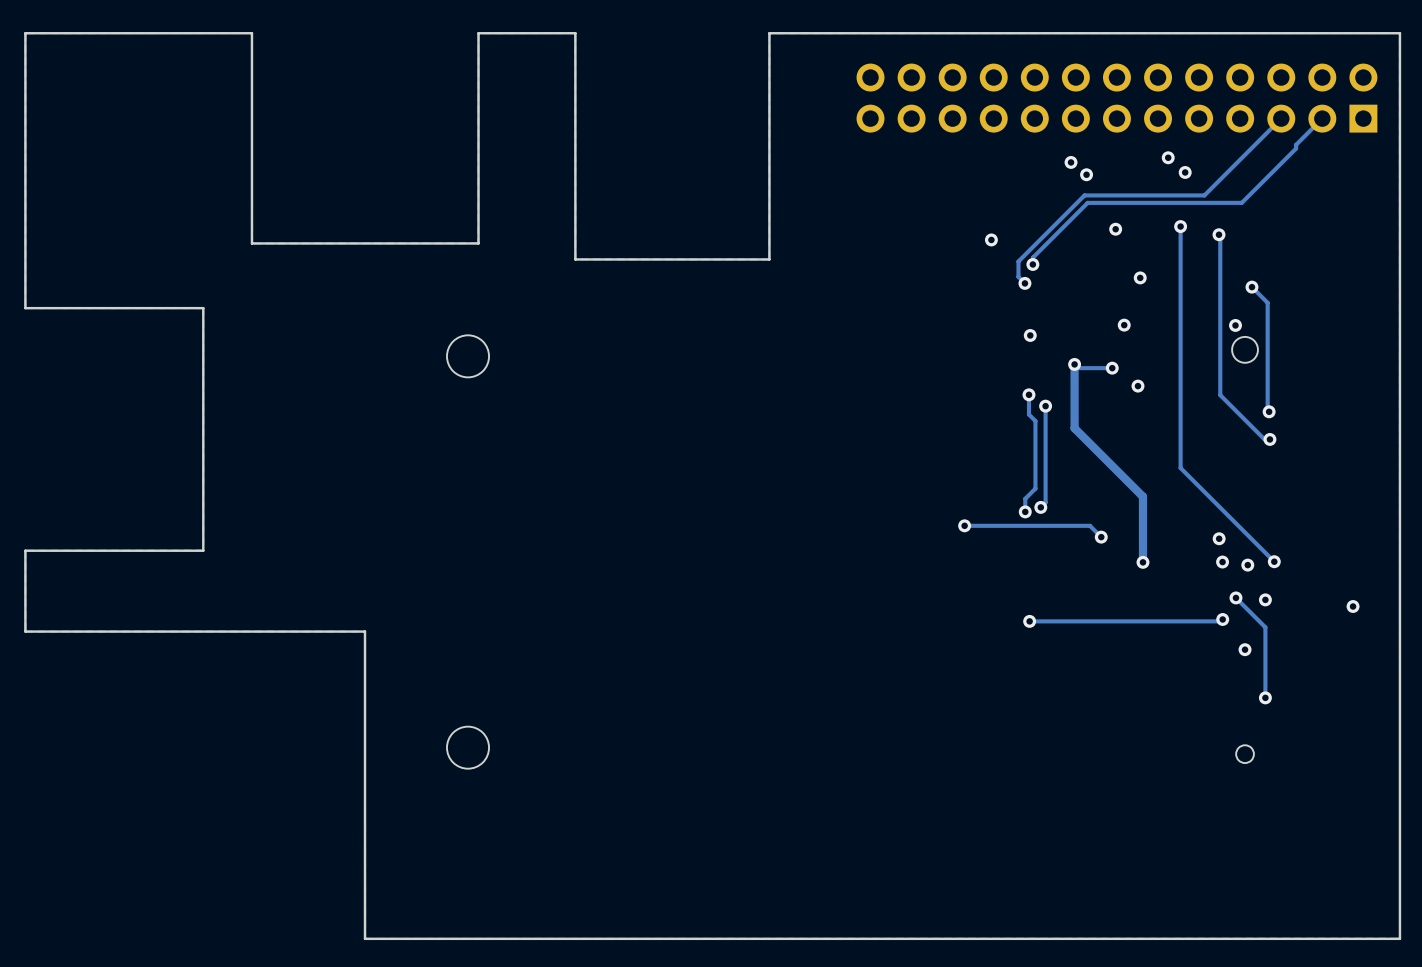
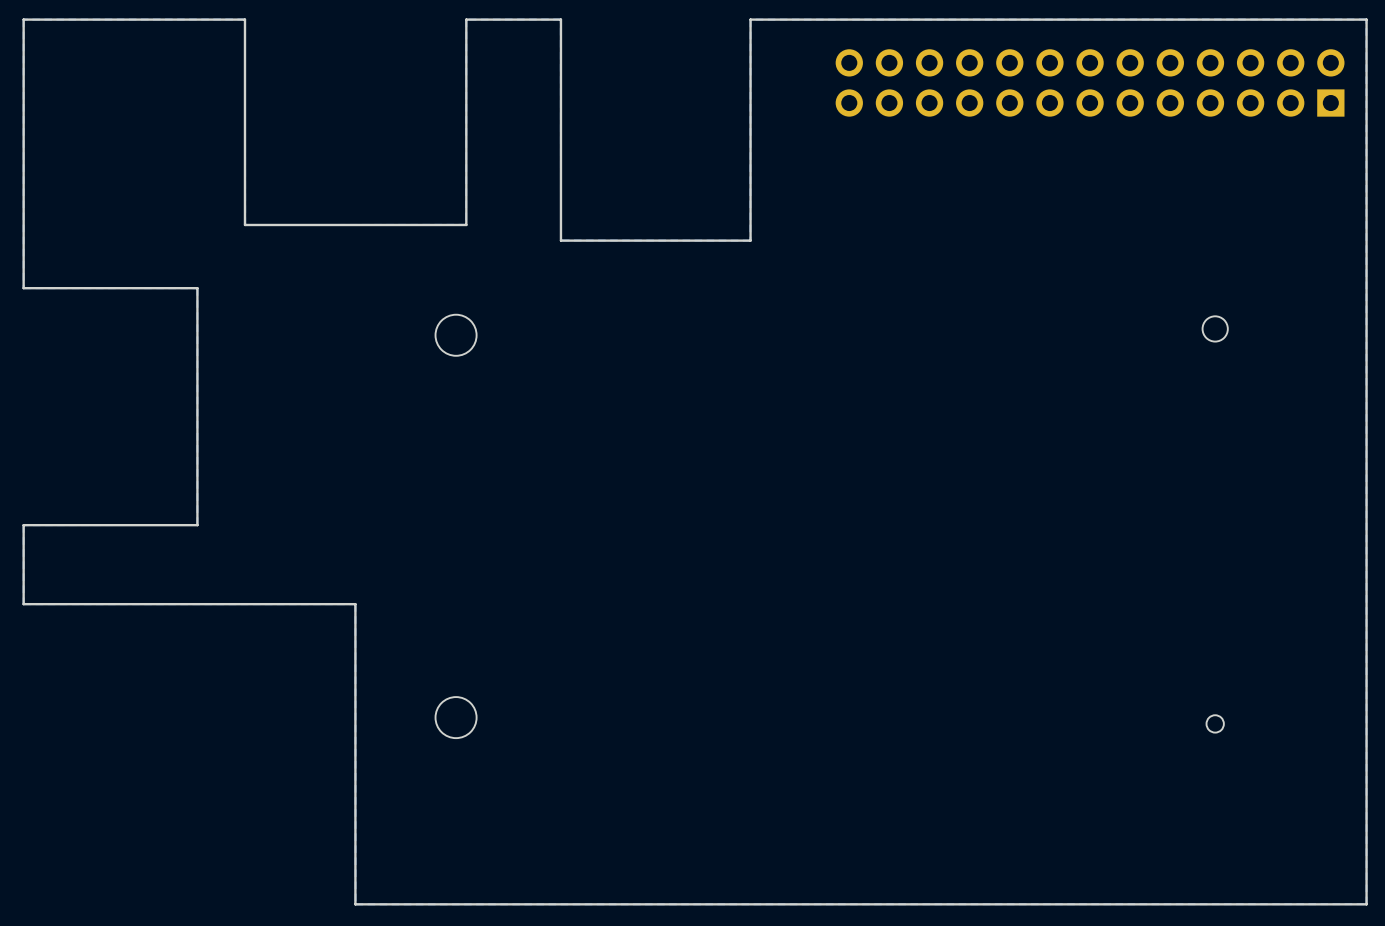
track: (1281, 118) (1204, 195) (1084, 195) (1018, 261) (1018, 276) (1024, 283) -> none
track: (1322, 118) (1296, 144) (1296, 148) (1241, 202) (1087, 202) (1032, 257) (1032, 264) -> none
via: (1168, 157) -> none
via: (1071, 162) -> none
via: (1185, 172) -> none
via: (1086, 174) -> none
track: (1180, 226) (1180, 468) (1274, 561) -> none
via: (1180, 226) -> none
via: (1115, 229) -> none
track: (1219, 234) (1220, 395) (1264, 439) (1269, 439) -> none
via: (1219, 234) -> none
via: (991, 239) -> none
via: (1032, 264) -> none
via: (1140, 277) -> none
via: (1024, 283) -> none
track: (1251, 287) (1267, 302) (1269, 411) -> none
via: (1251, 287) -> none
via: (1124, 325) -> none
via: (1235, 325) -> none
via: (1030, 335) -> none
via: (1074, 364) -> none
track: (1112, 368) (1078, 368) (1074, 364) (1074, 428) (1142, 496) (1142, 562) -> none
via: (1112, 368) -> none
via: (1137, 386) -> none
track: (1028, 394) (1028, 414) (1035, 421) (1035, 488) (1025, 498) (1025, 511) -> none
via: (1028, 394) -> none
track: (1045, 406) (1045, 502) (1040, 507) -> none
via: (1045, 406) -> none
via: (1269, 411) -> none
via: (1269, 439) -> none
via: (1040, 507) -> none
via: (1025, 511) -> none
track: (964, 525) (1089, 525) (1101, 537) -> none
via: (964, 525) -> none
via: (1101, 537) -> none
via: (1219, 538) -> none
via: (1274, 561) -> none
via: (1142, 562) -> none
via: (1222, 562) -> none
via: (1247, 565) -> none
track: (1235, 597) (1265, 627) (1265, 697) -> none
via: (1235, 597) -> none
via: (1265, 599) -> none
via: (1353, 606) -> none
track: (1222, 619) (1220, 621) (1029, 621) -> none
via: (1222, 619) -> none
via: (1029, 621) -> none
via: (1245, 649) -> none
via: (1265, 697) -> none

